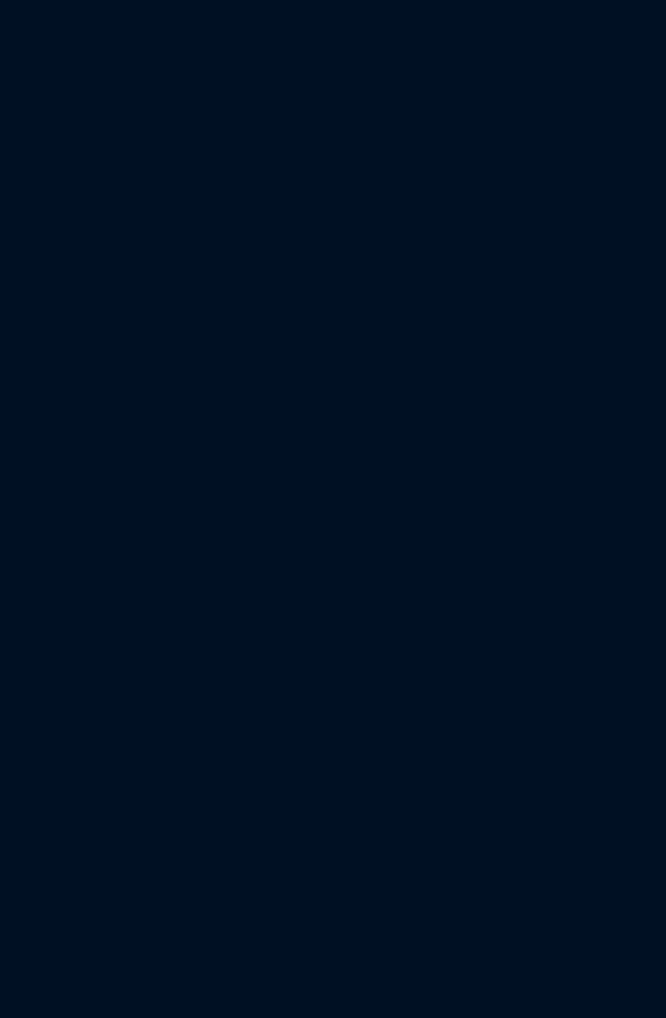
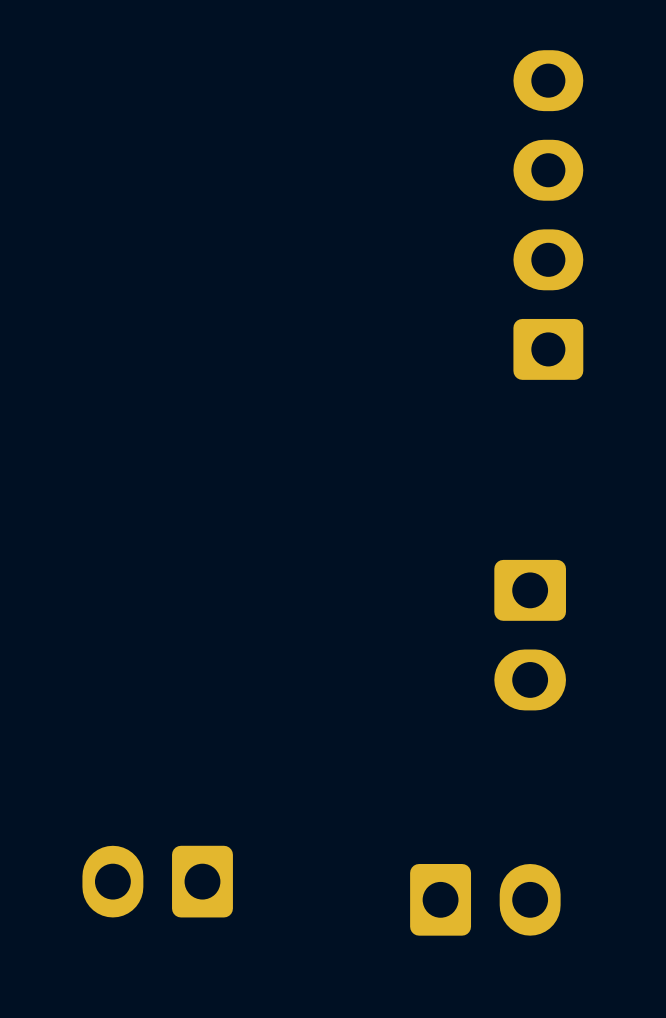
part: none -> (548, 215)
part: none -> (530, 635)
part: none -> (157, 881)
part: none -> (485, 899)

